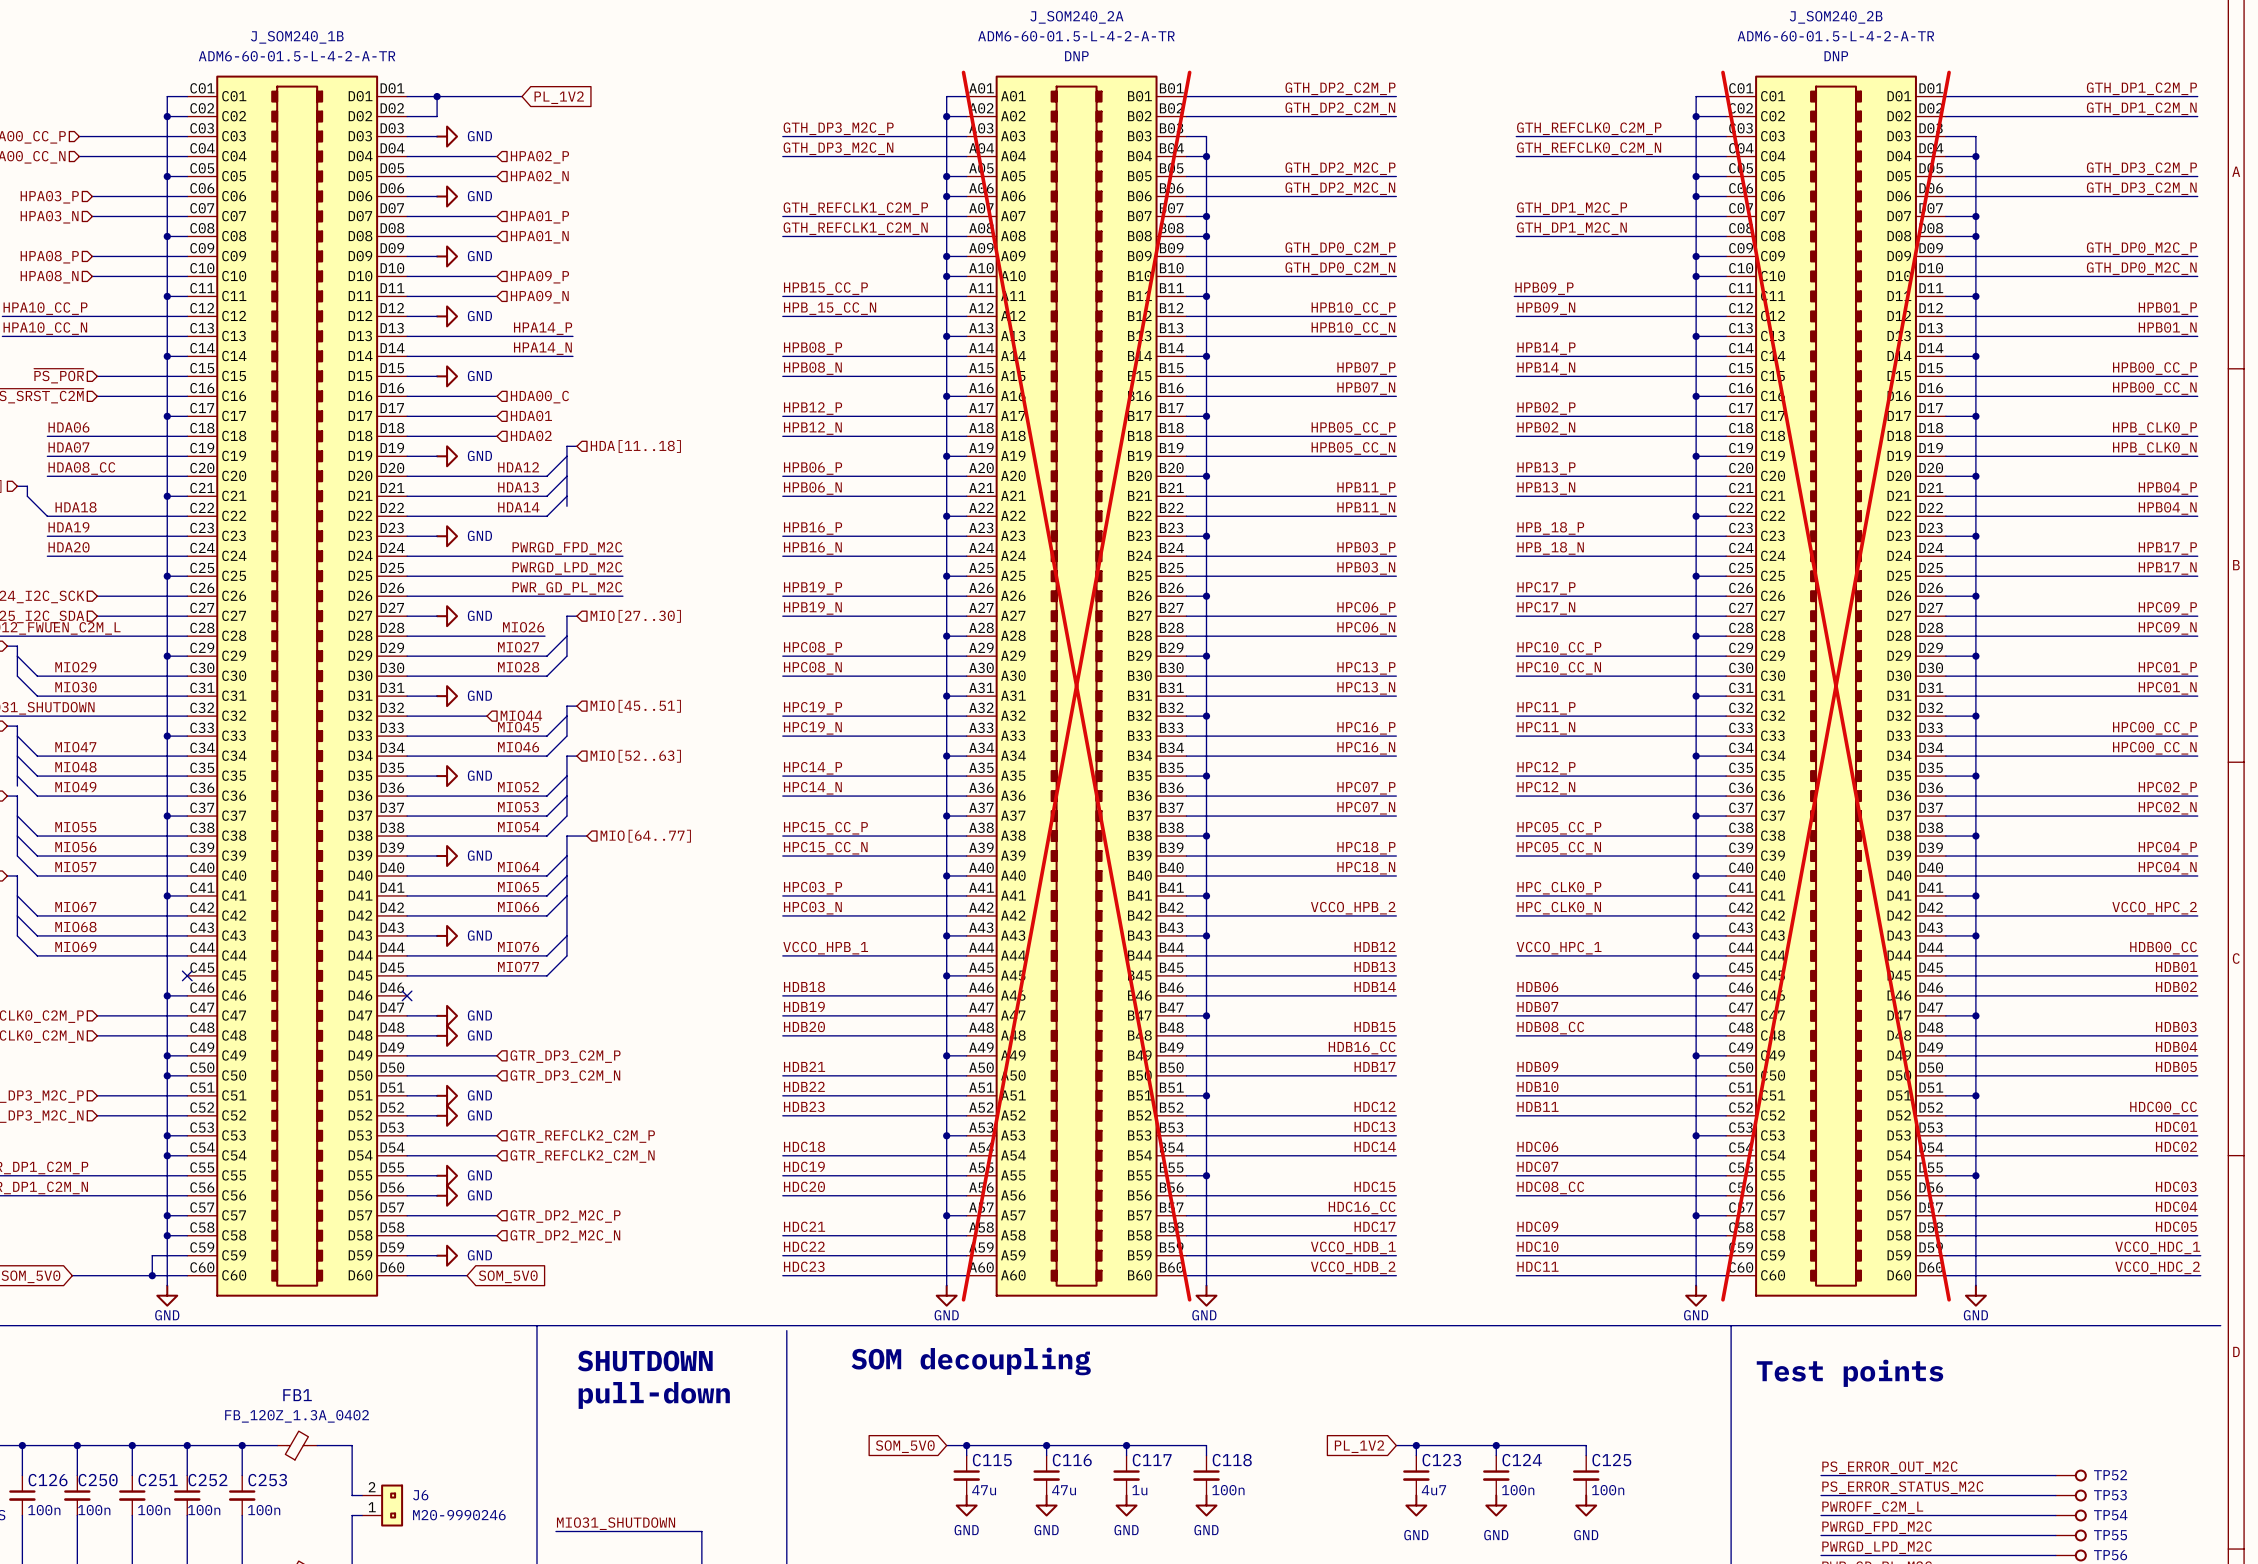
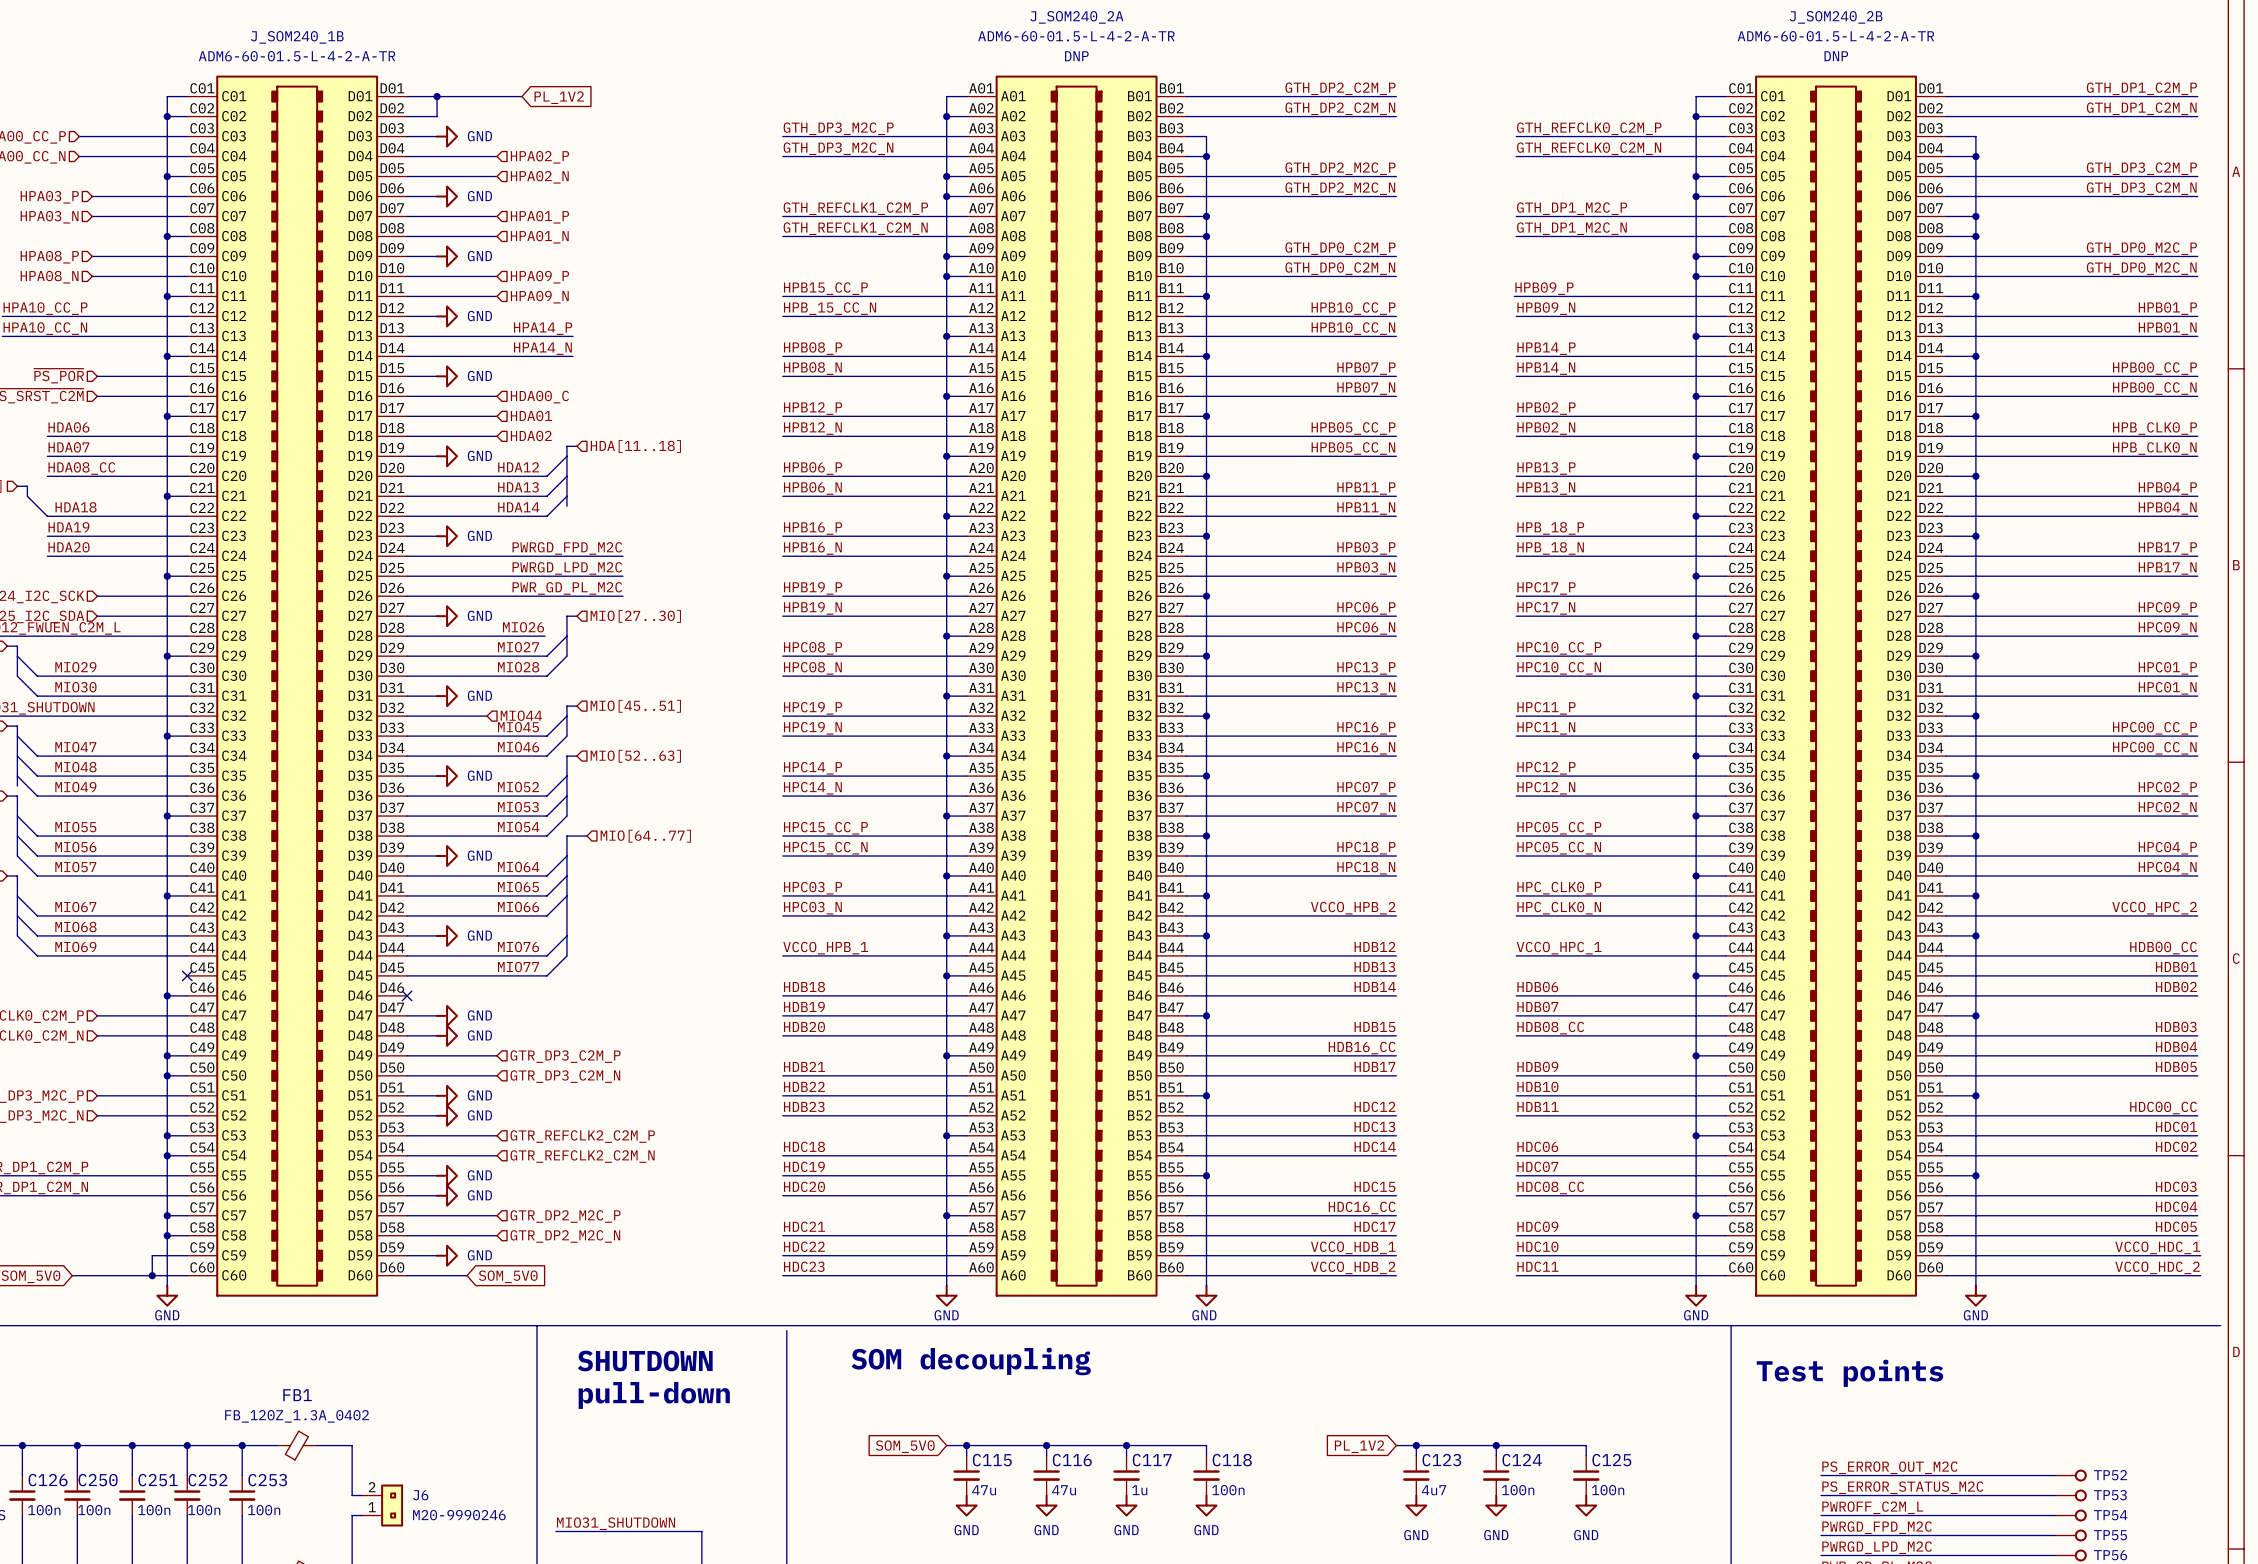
J_SOM240_2A do-not-place cross: (1076, 686) -> none
J_SOM240_2B do-not-place cross: (1836, 686) -> none

